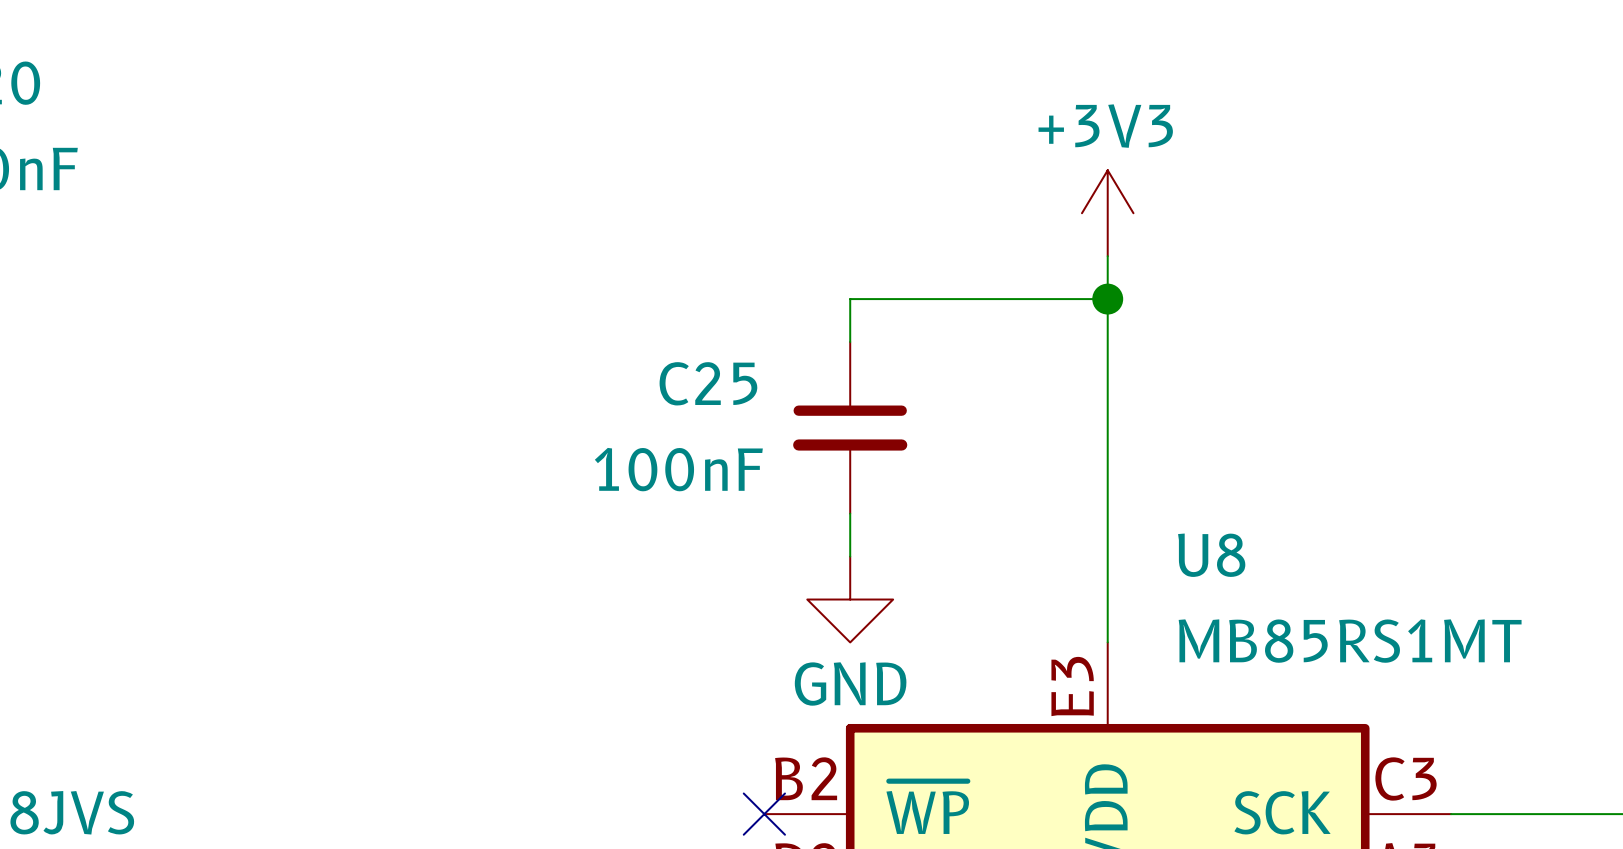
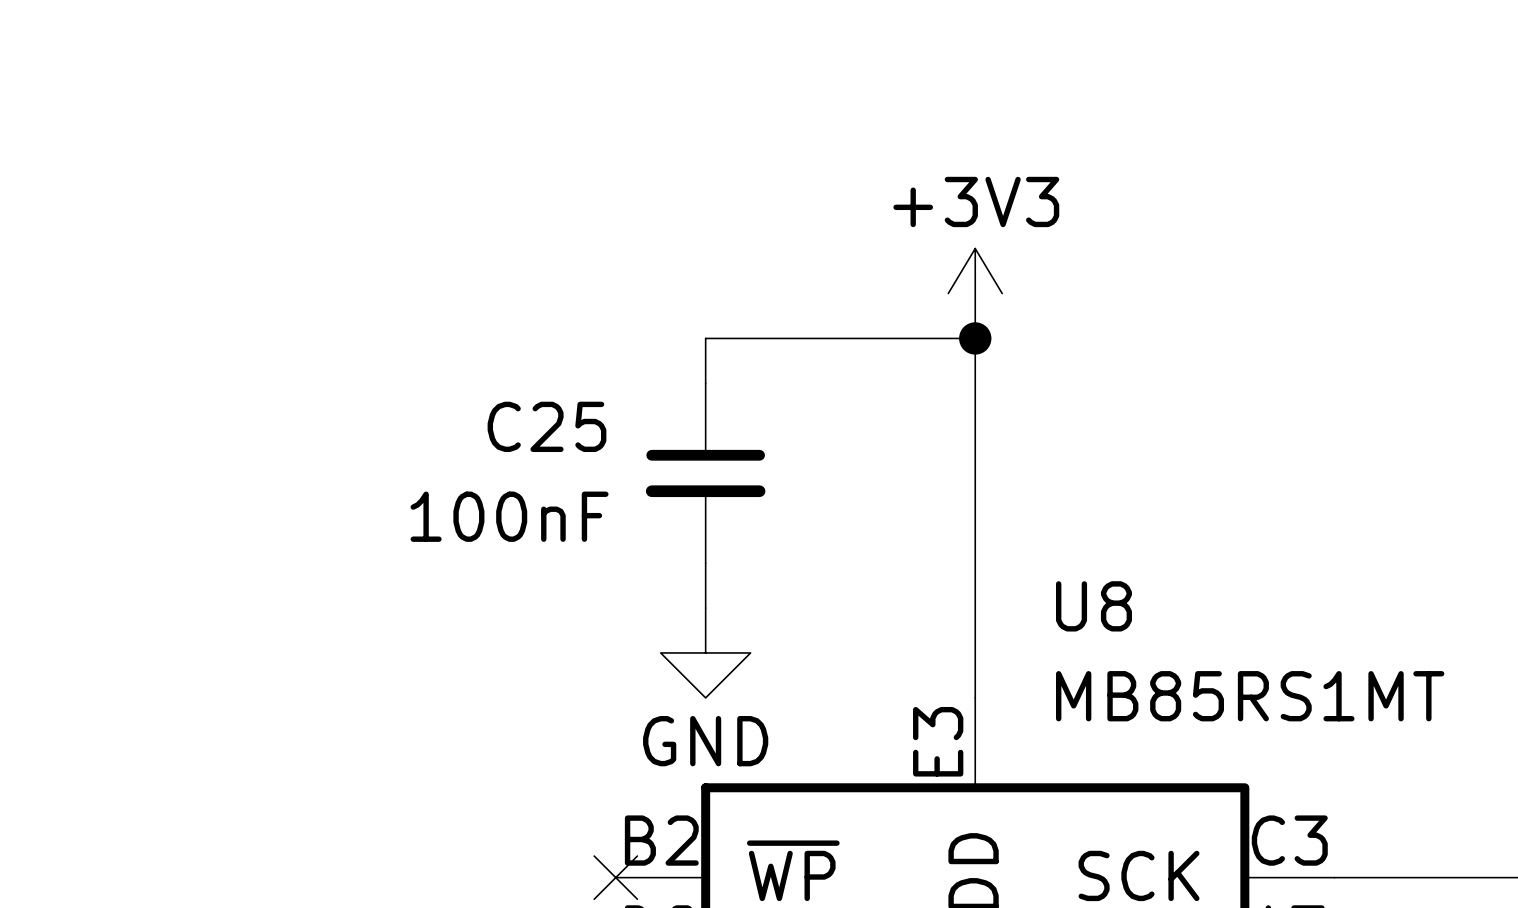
power symbol position: +3V3 (1107, 213) -> +3V3 (975, 293)

